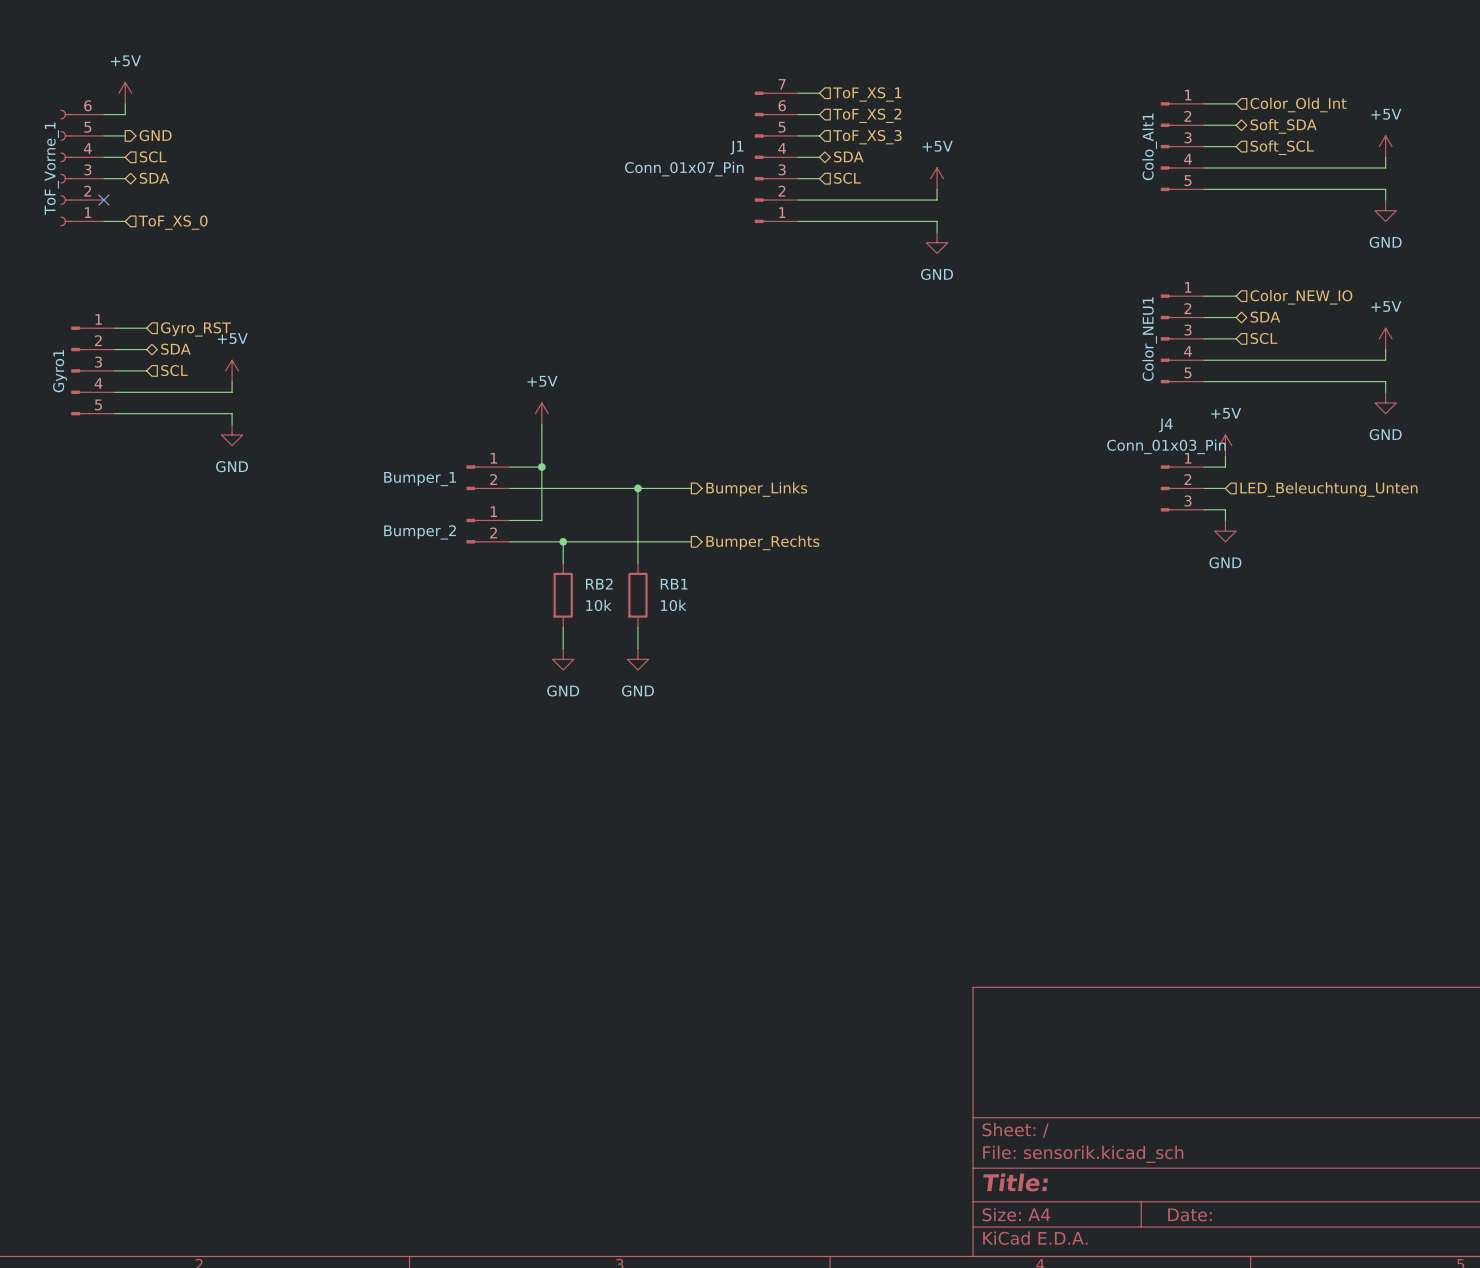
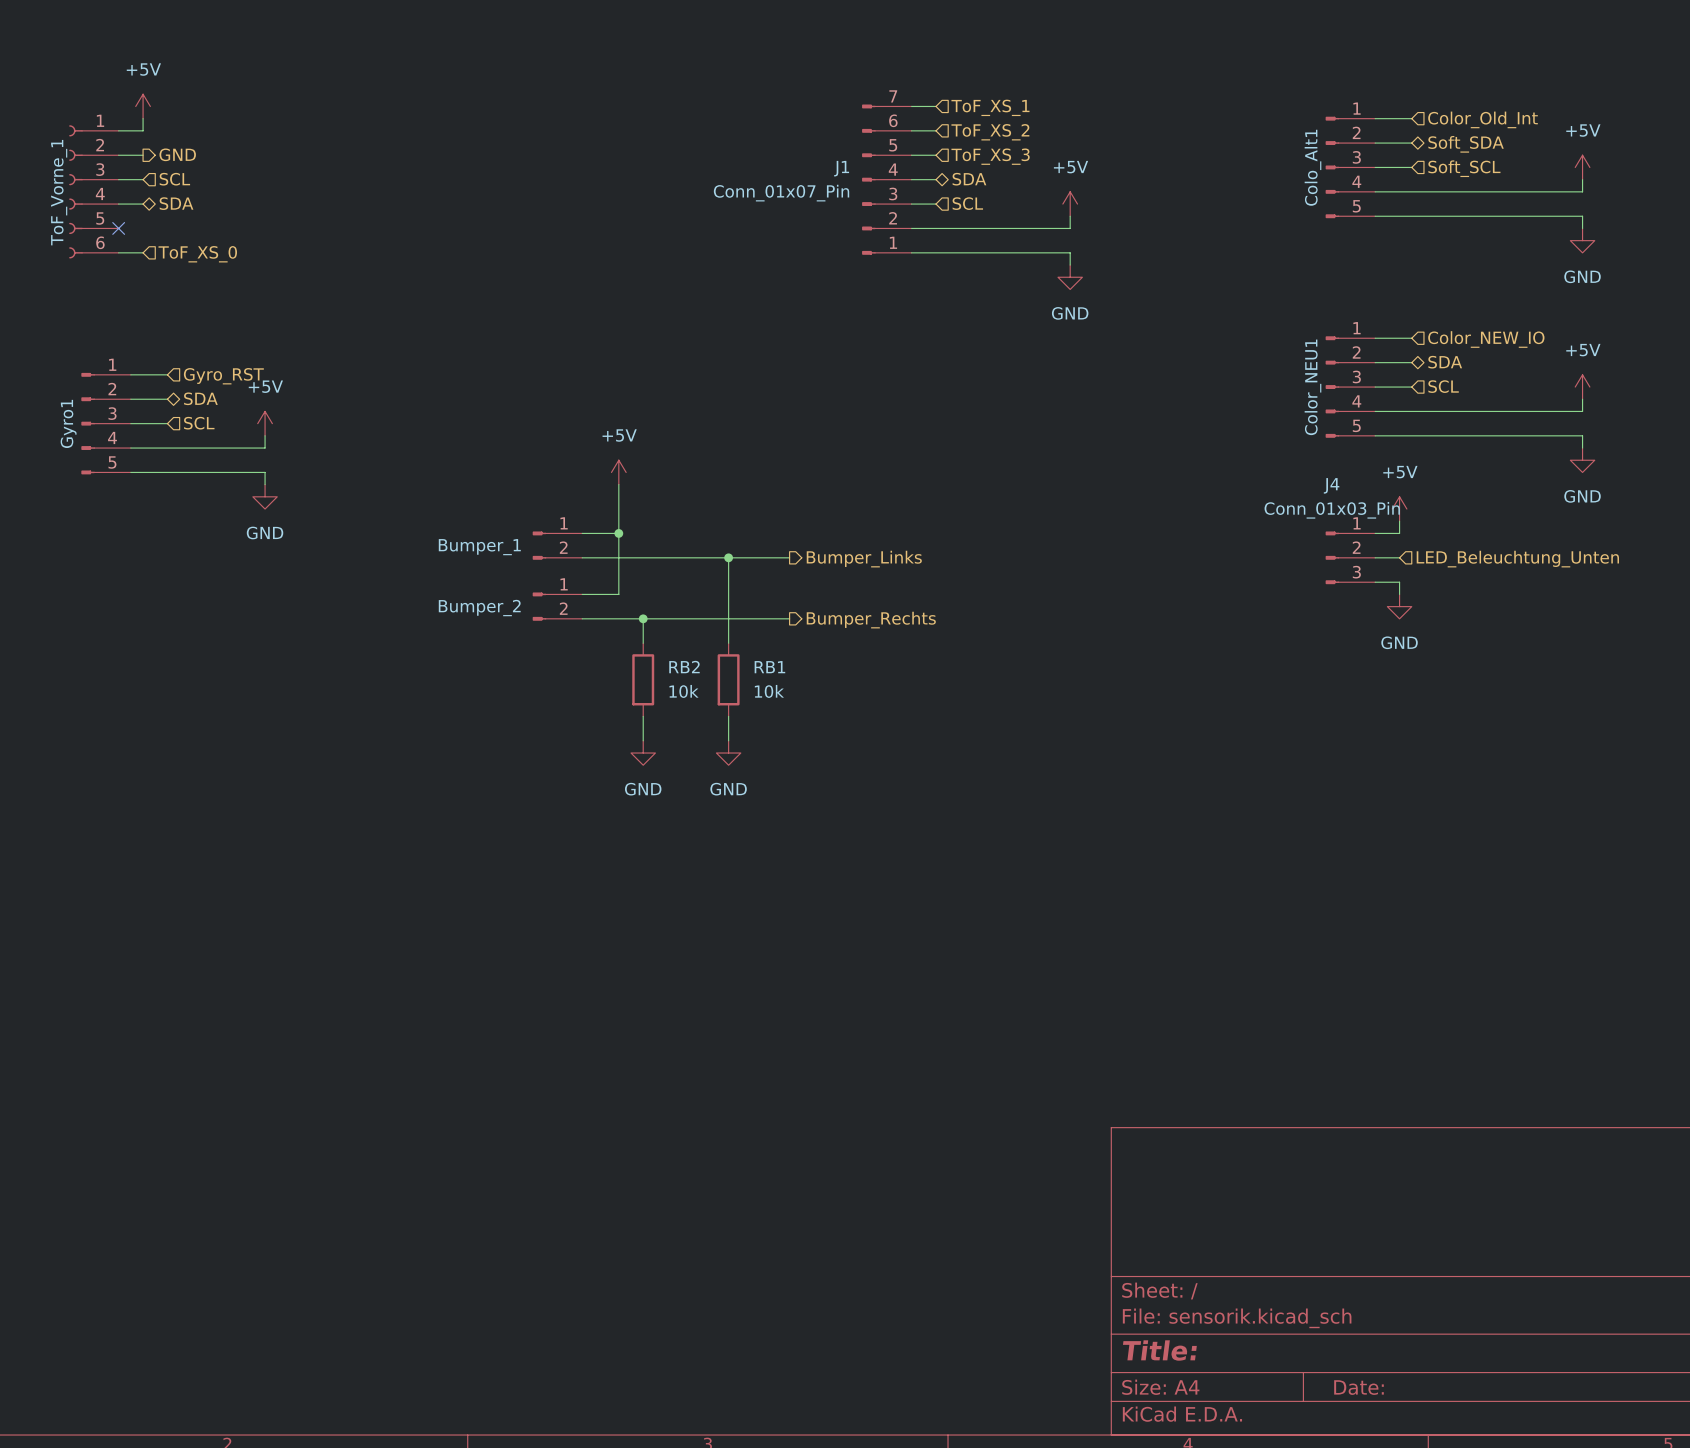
ToF_Vorne_1 flip: as is (66, 167) -> up-down (75, 191)

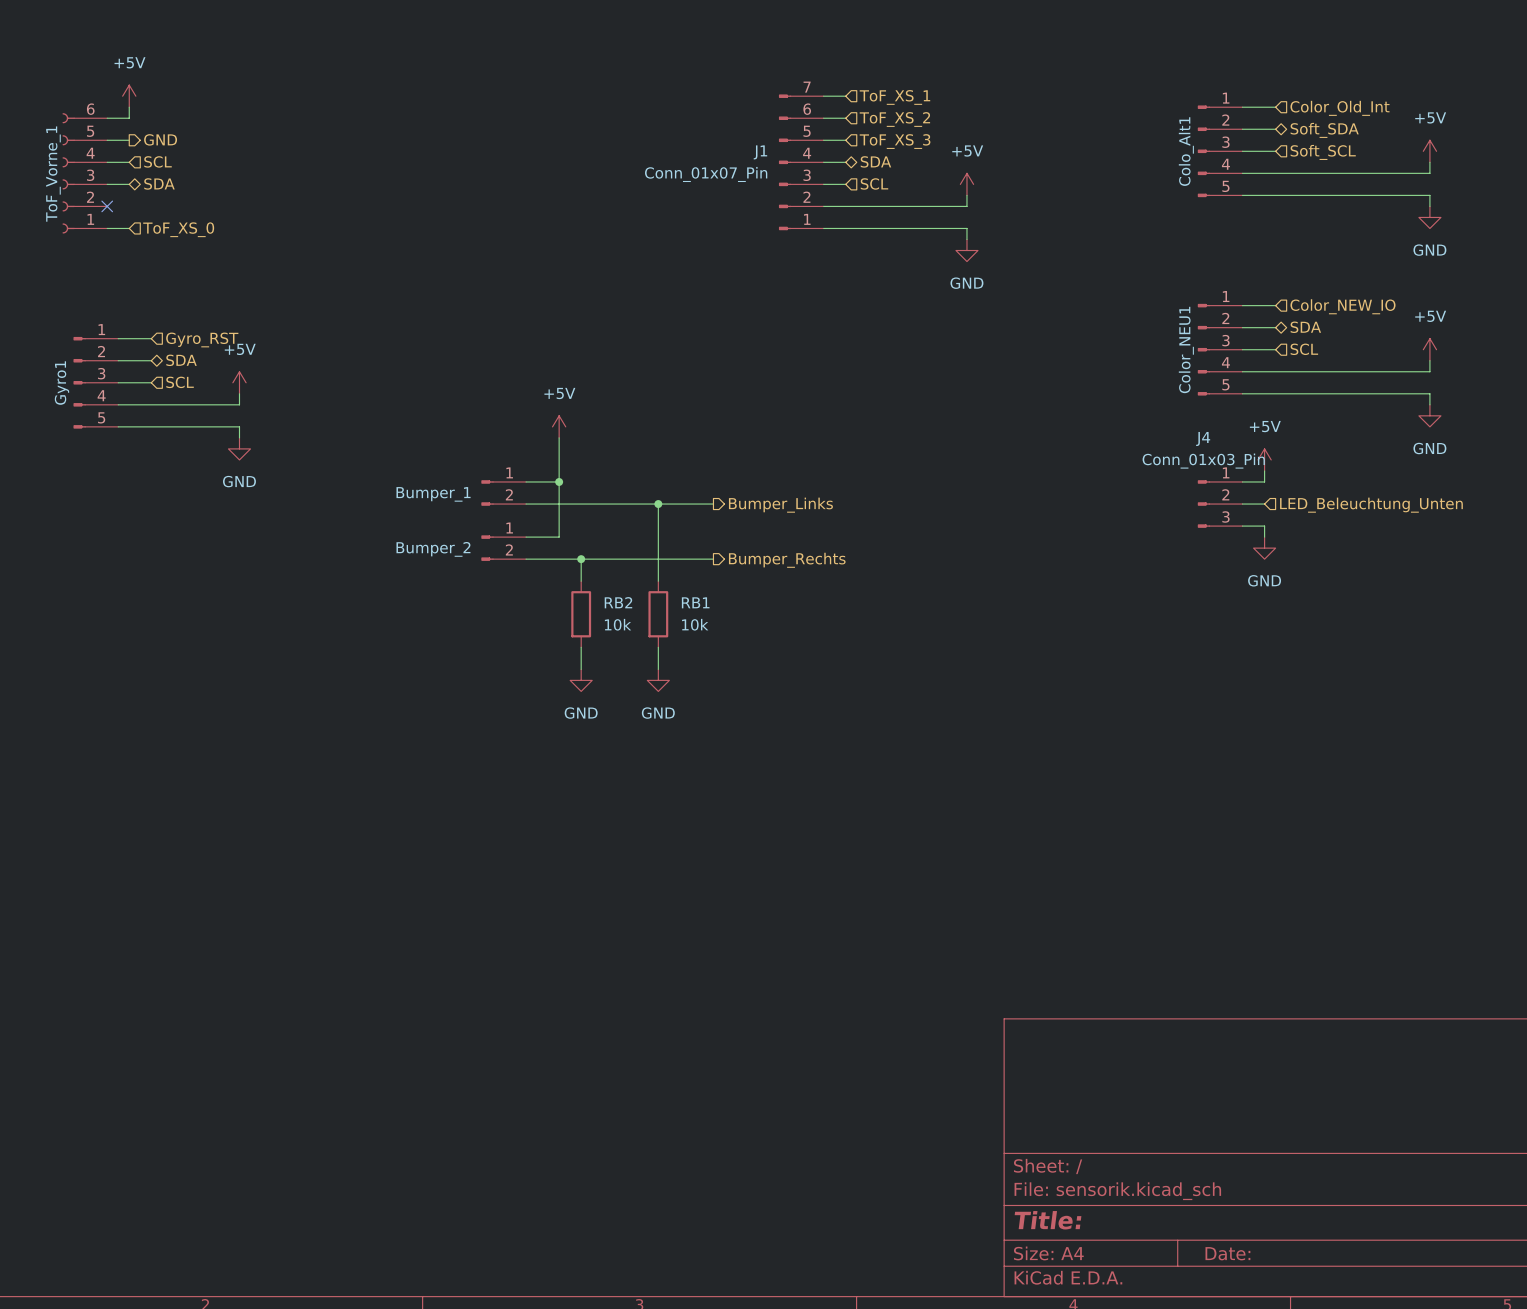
ToF_Vorne_1 flip: as is (75, 191) -> up-down (68, 173)

